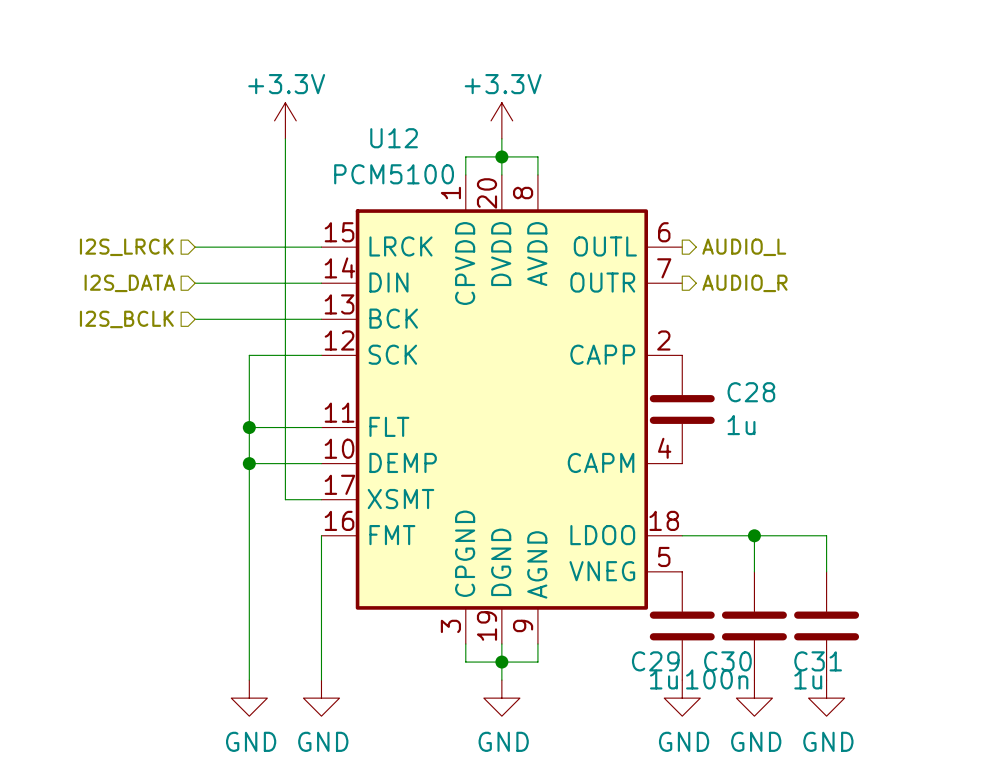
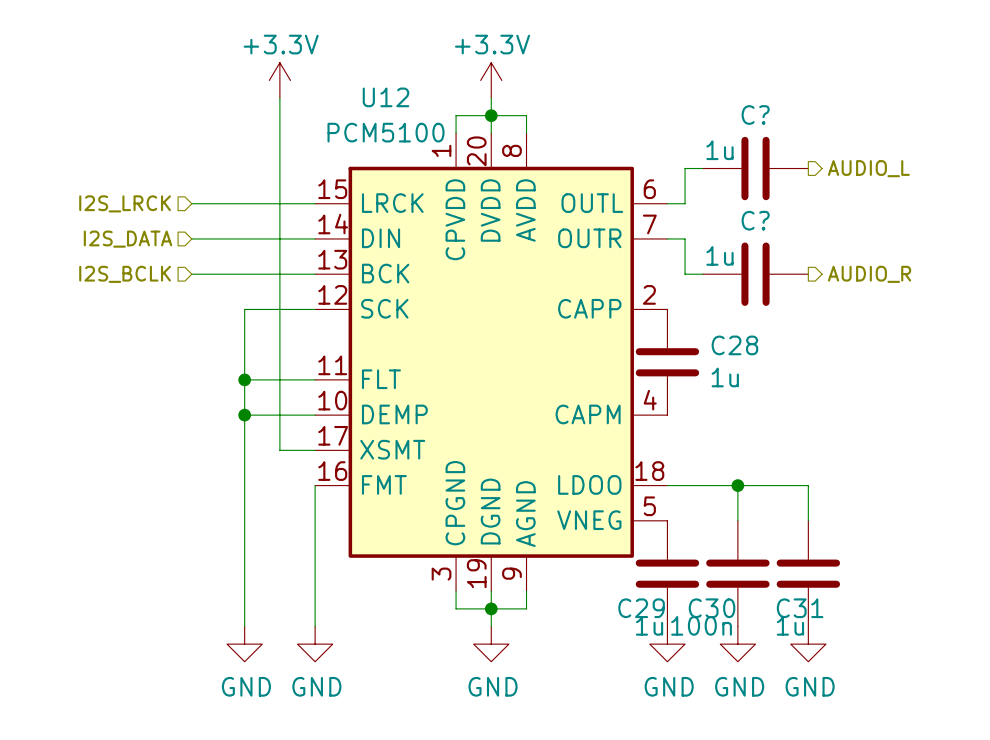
wire: none -> (702, 168) (685, 168) (685, 203) (667, 203)
C?: none -> 1u (755, 168)
hierarchical label position: AUDIO_L (744, 247) -> AUDIO_L (868, 168)
wire: none -> (667, 238) (685, 238) (685, 274) (702, 274)
hierarchical label position: AUDIO_R (744, 283) -> AUDIO_R (869, 274)
C?: none -> 1u (755, 274)

